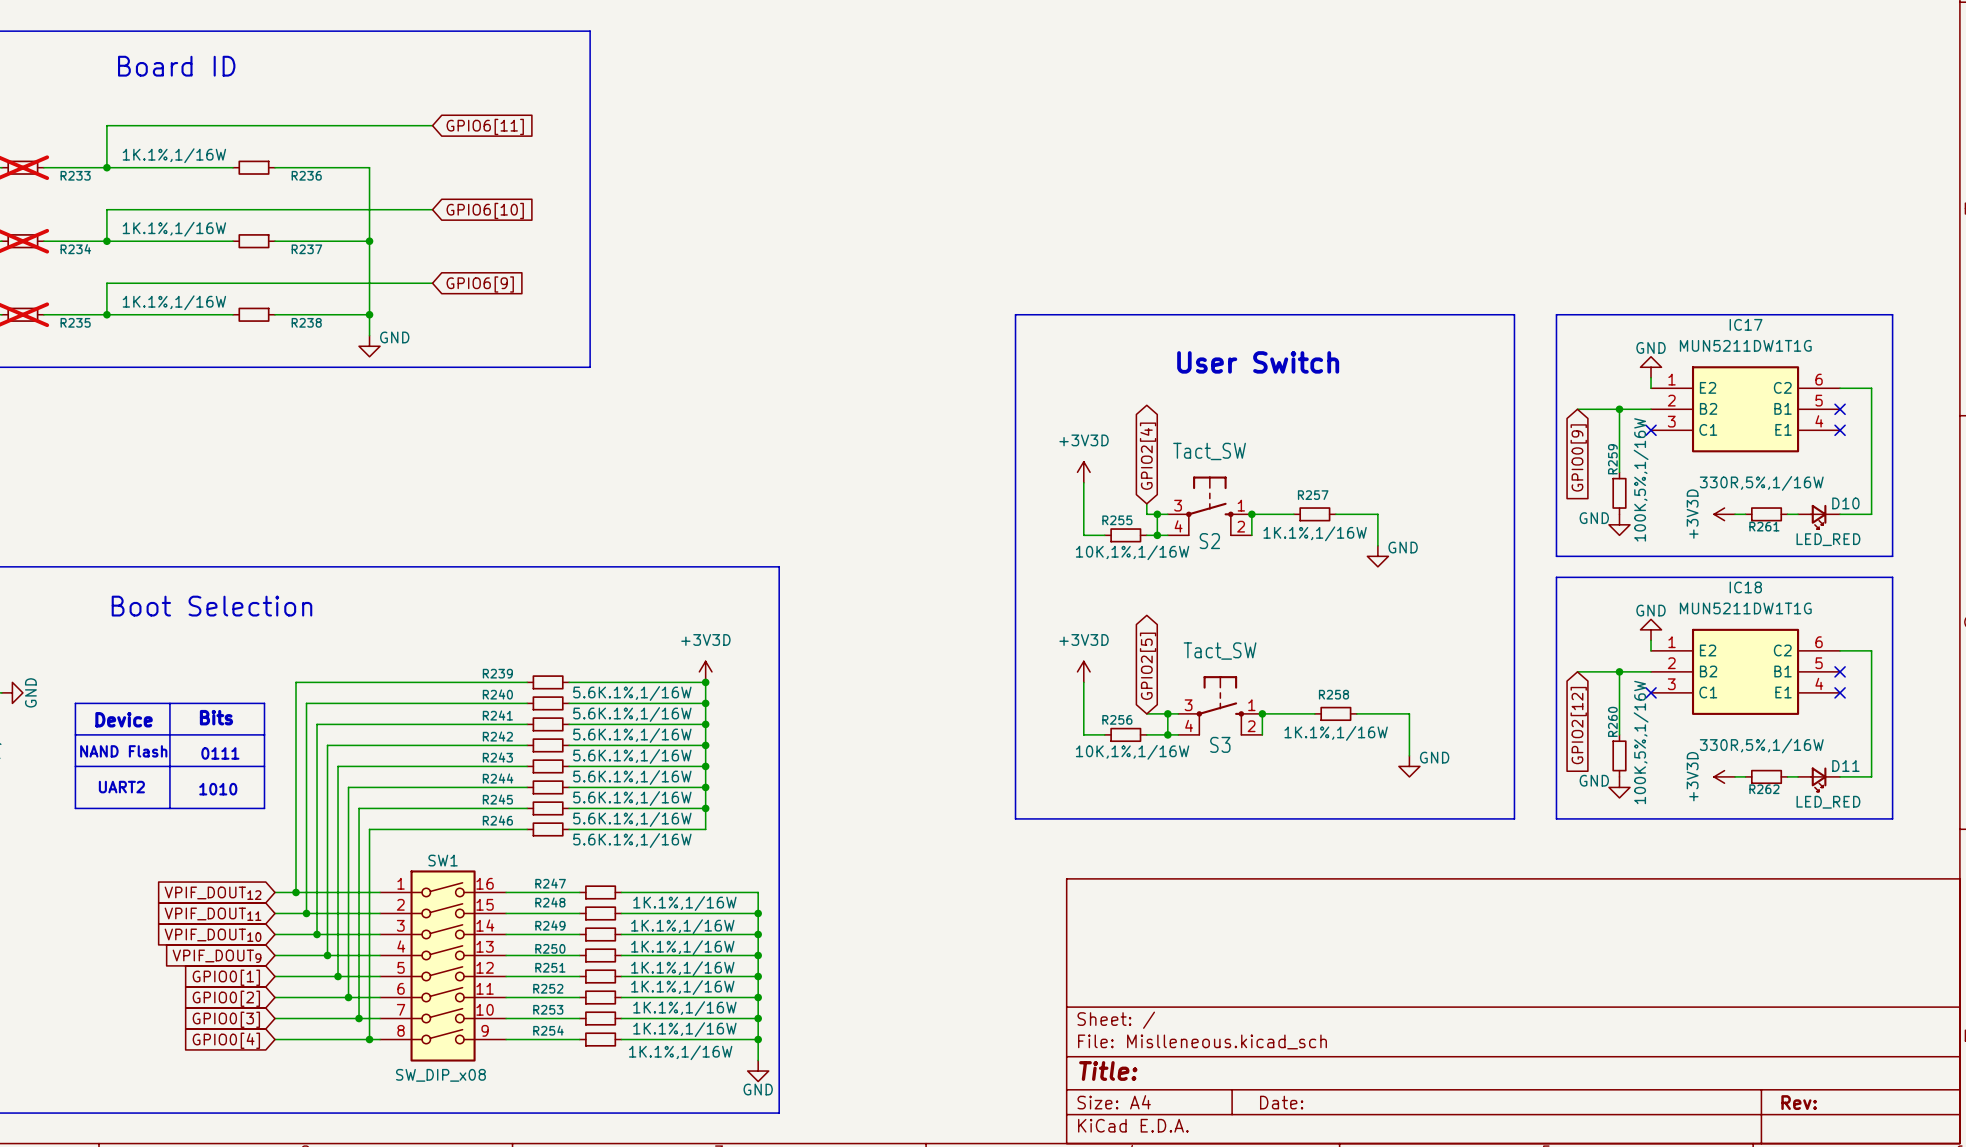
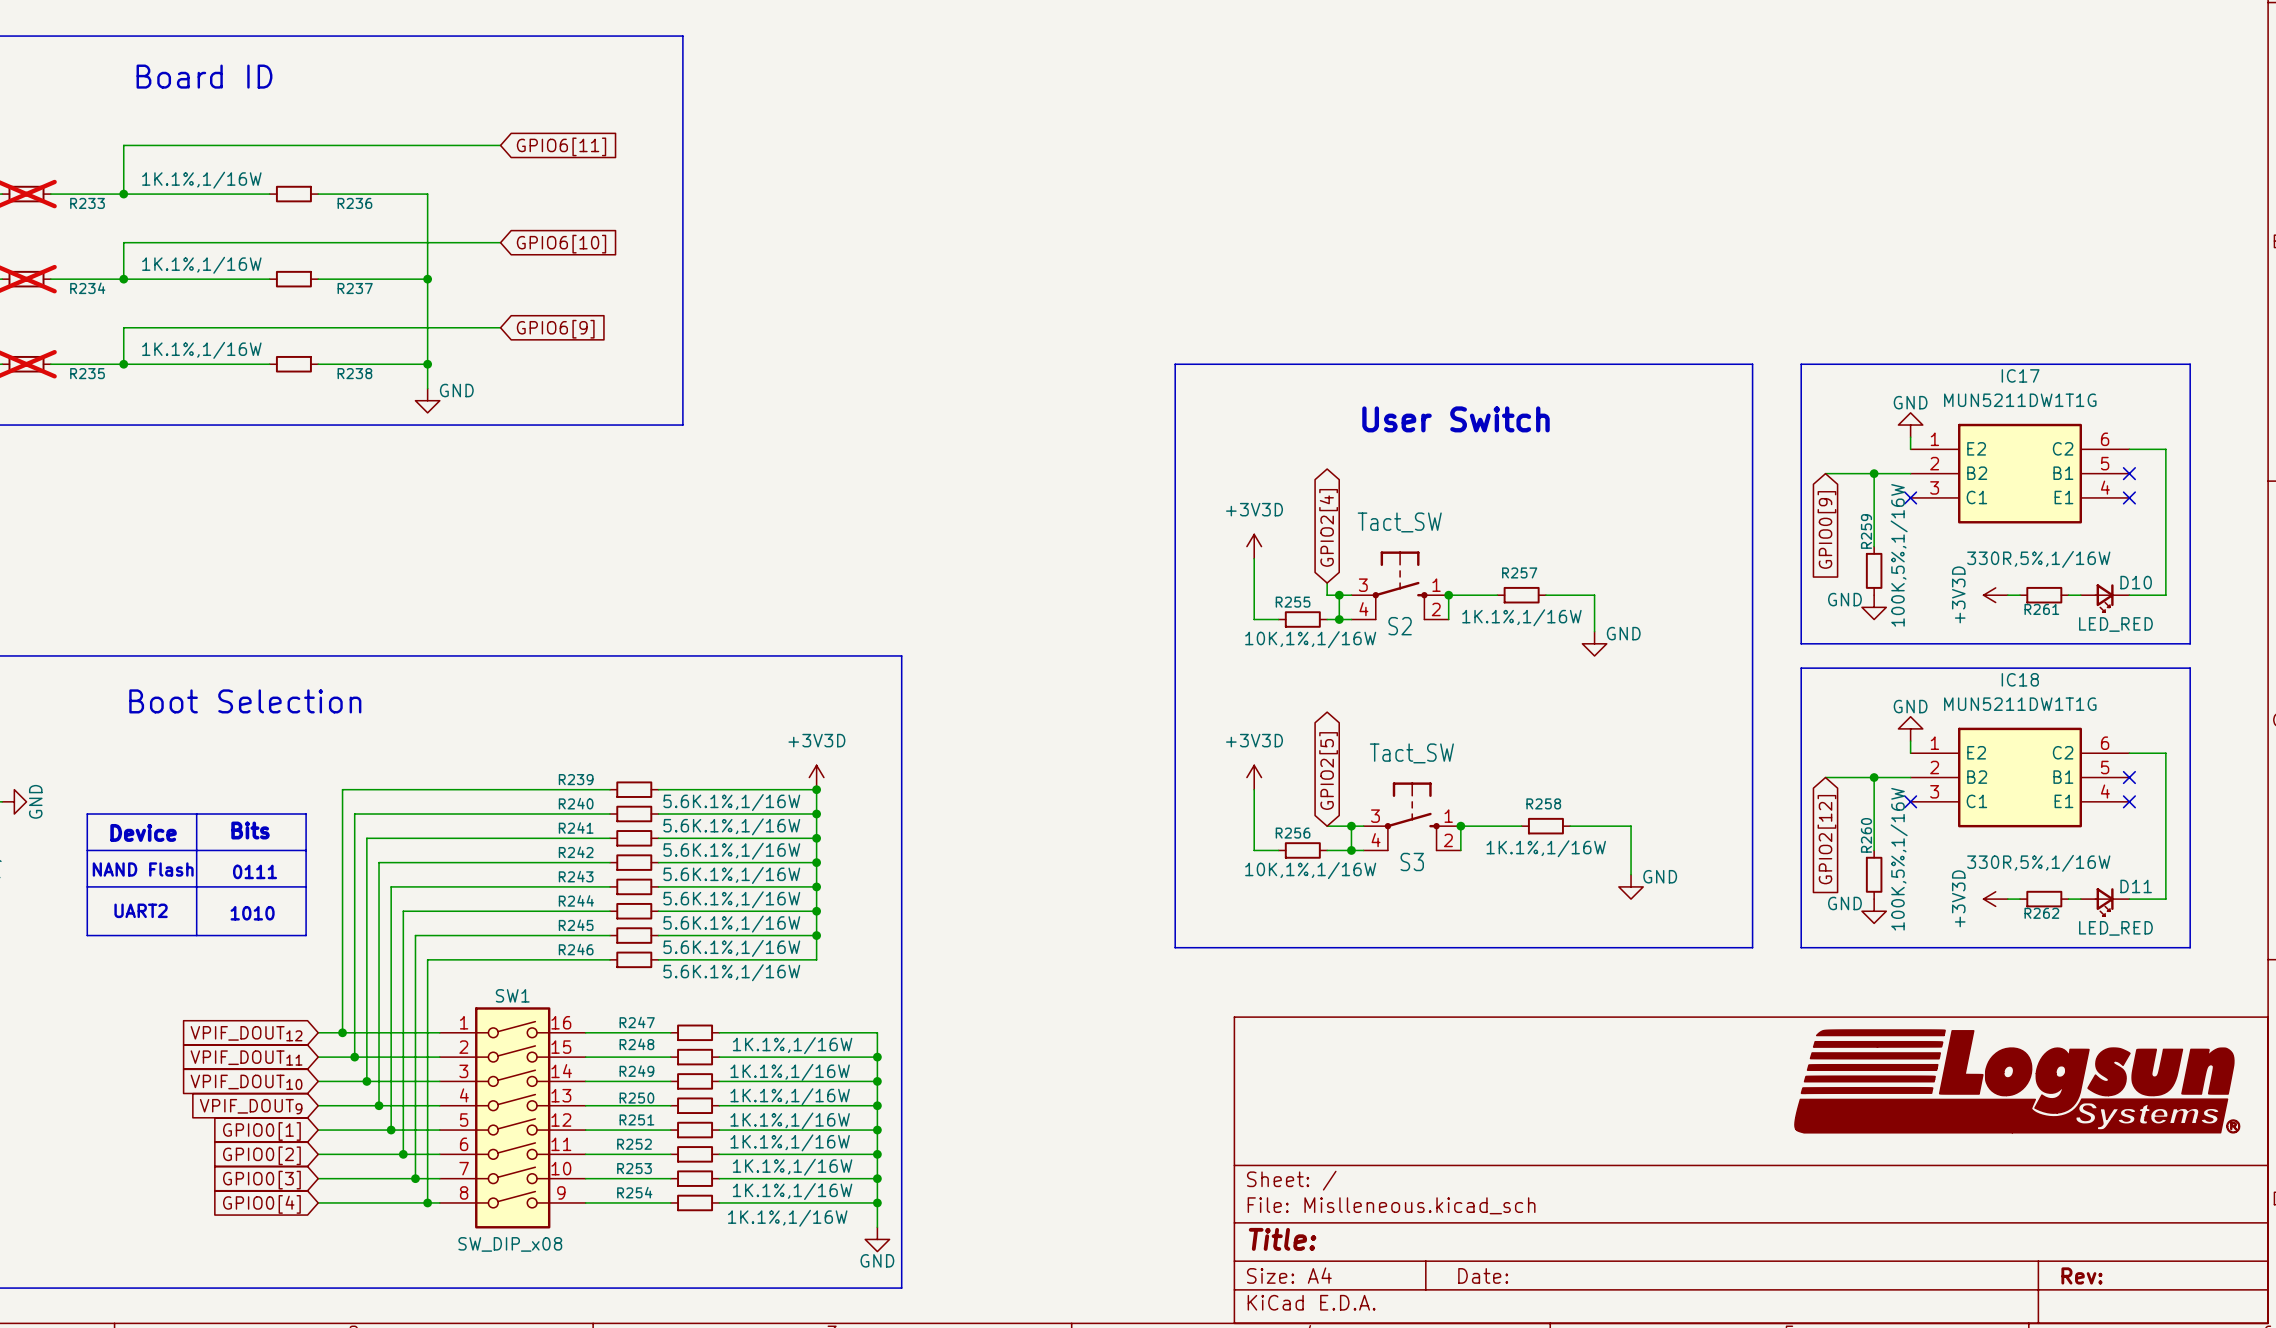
power symbol: none -> (2017, 1081)

